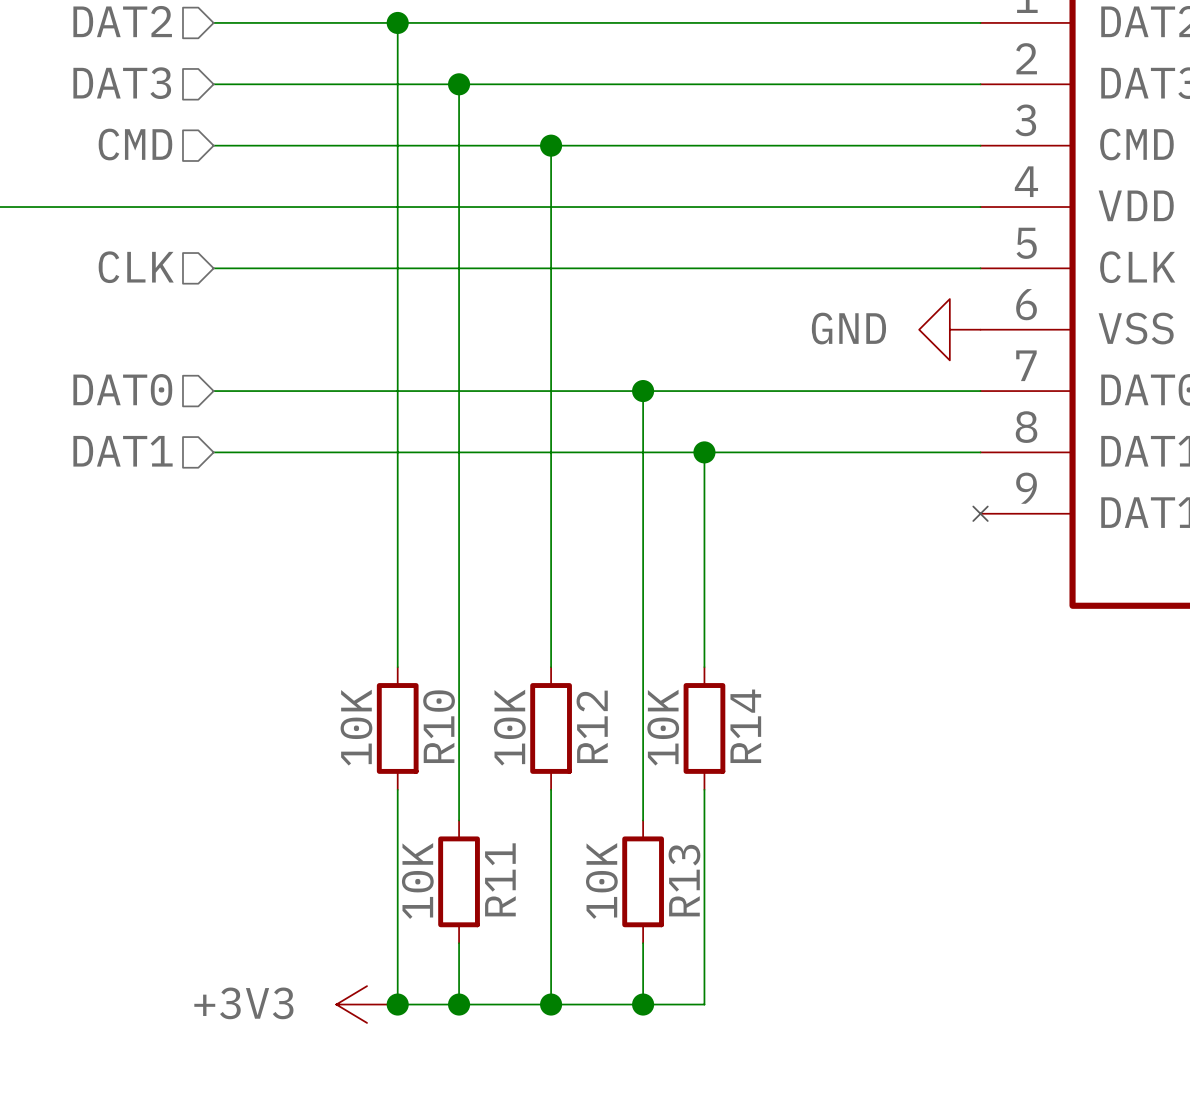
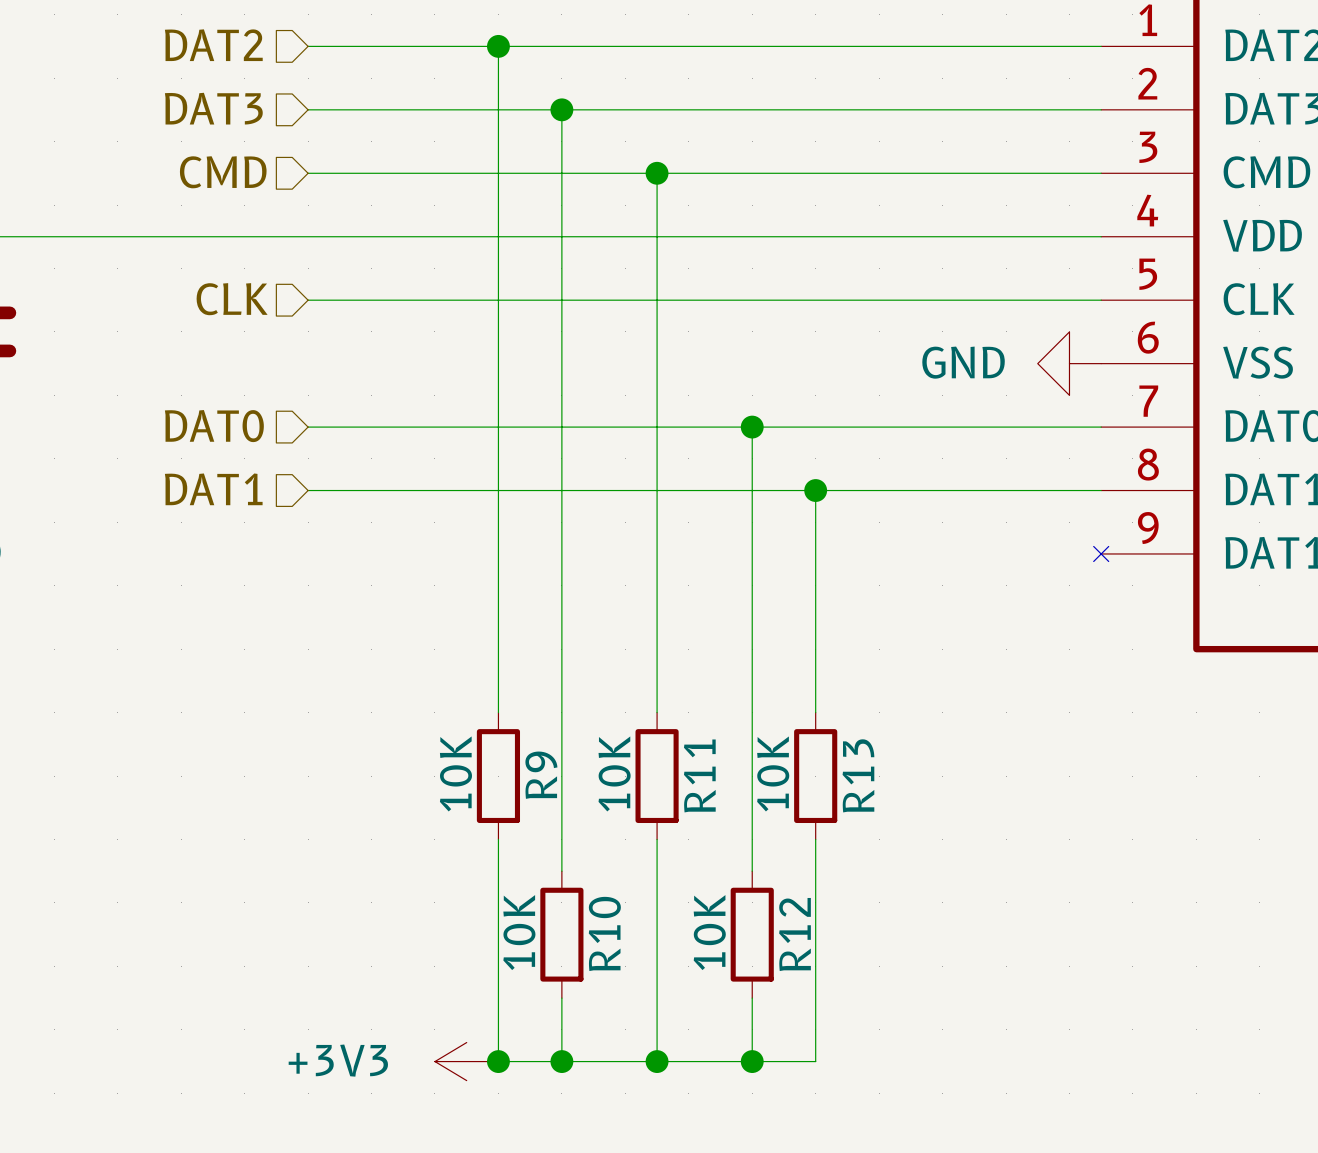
R10 name: R10 (439, 726) -> R9 (541, 775)
R12 name: R12 (592, 726) -> R11 (699, 775)
R14 name: R14 (745, 726) -> R13 (858, 775)
R11 name: R11 (500, 879) -> R10 (604, 933)
R13 name: R13 (684, 880) -> R12 (795, 934)

